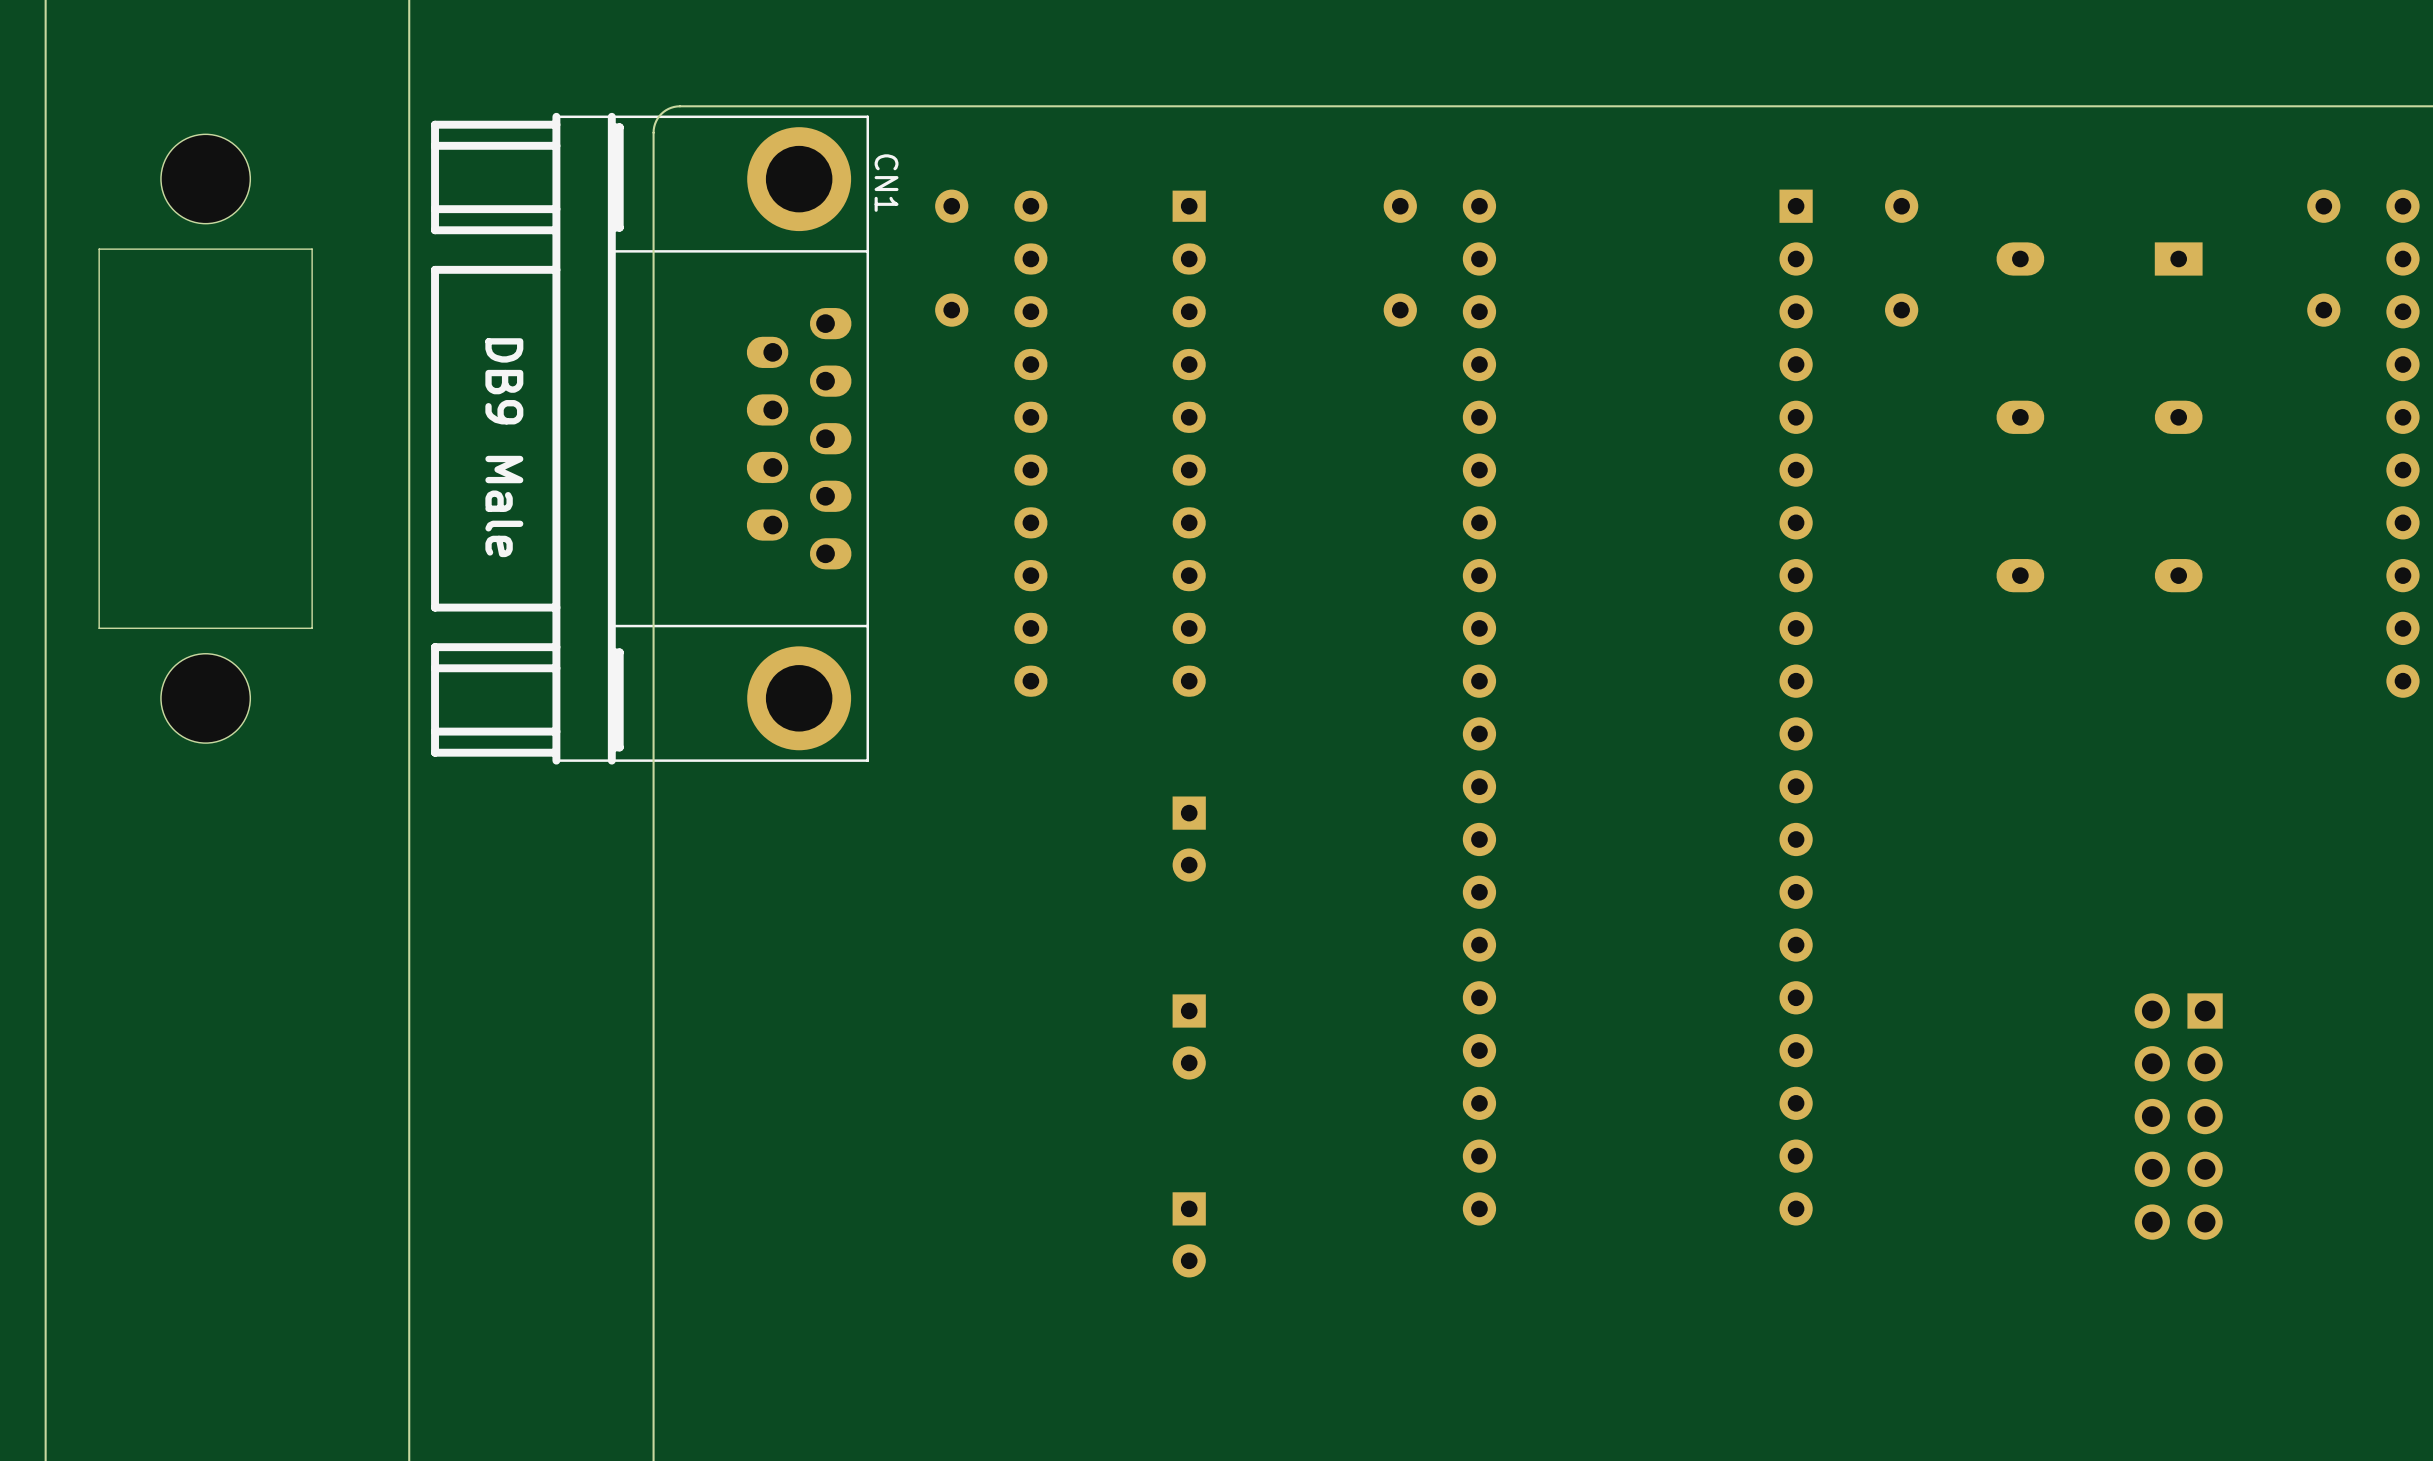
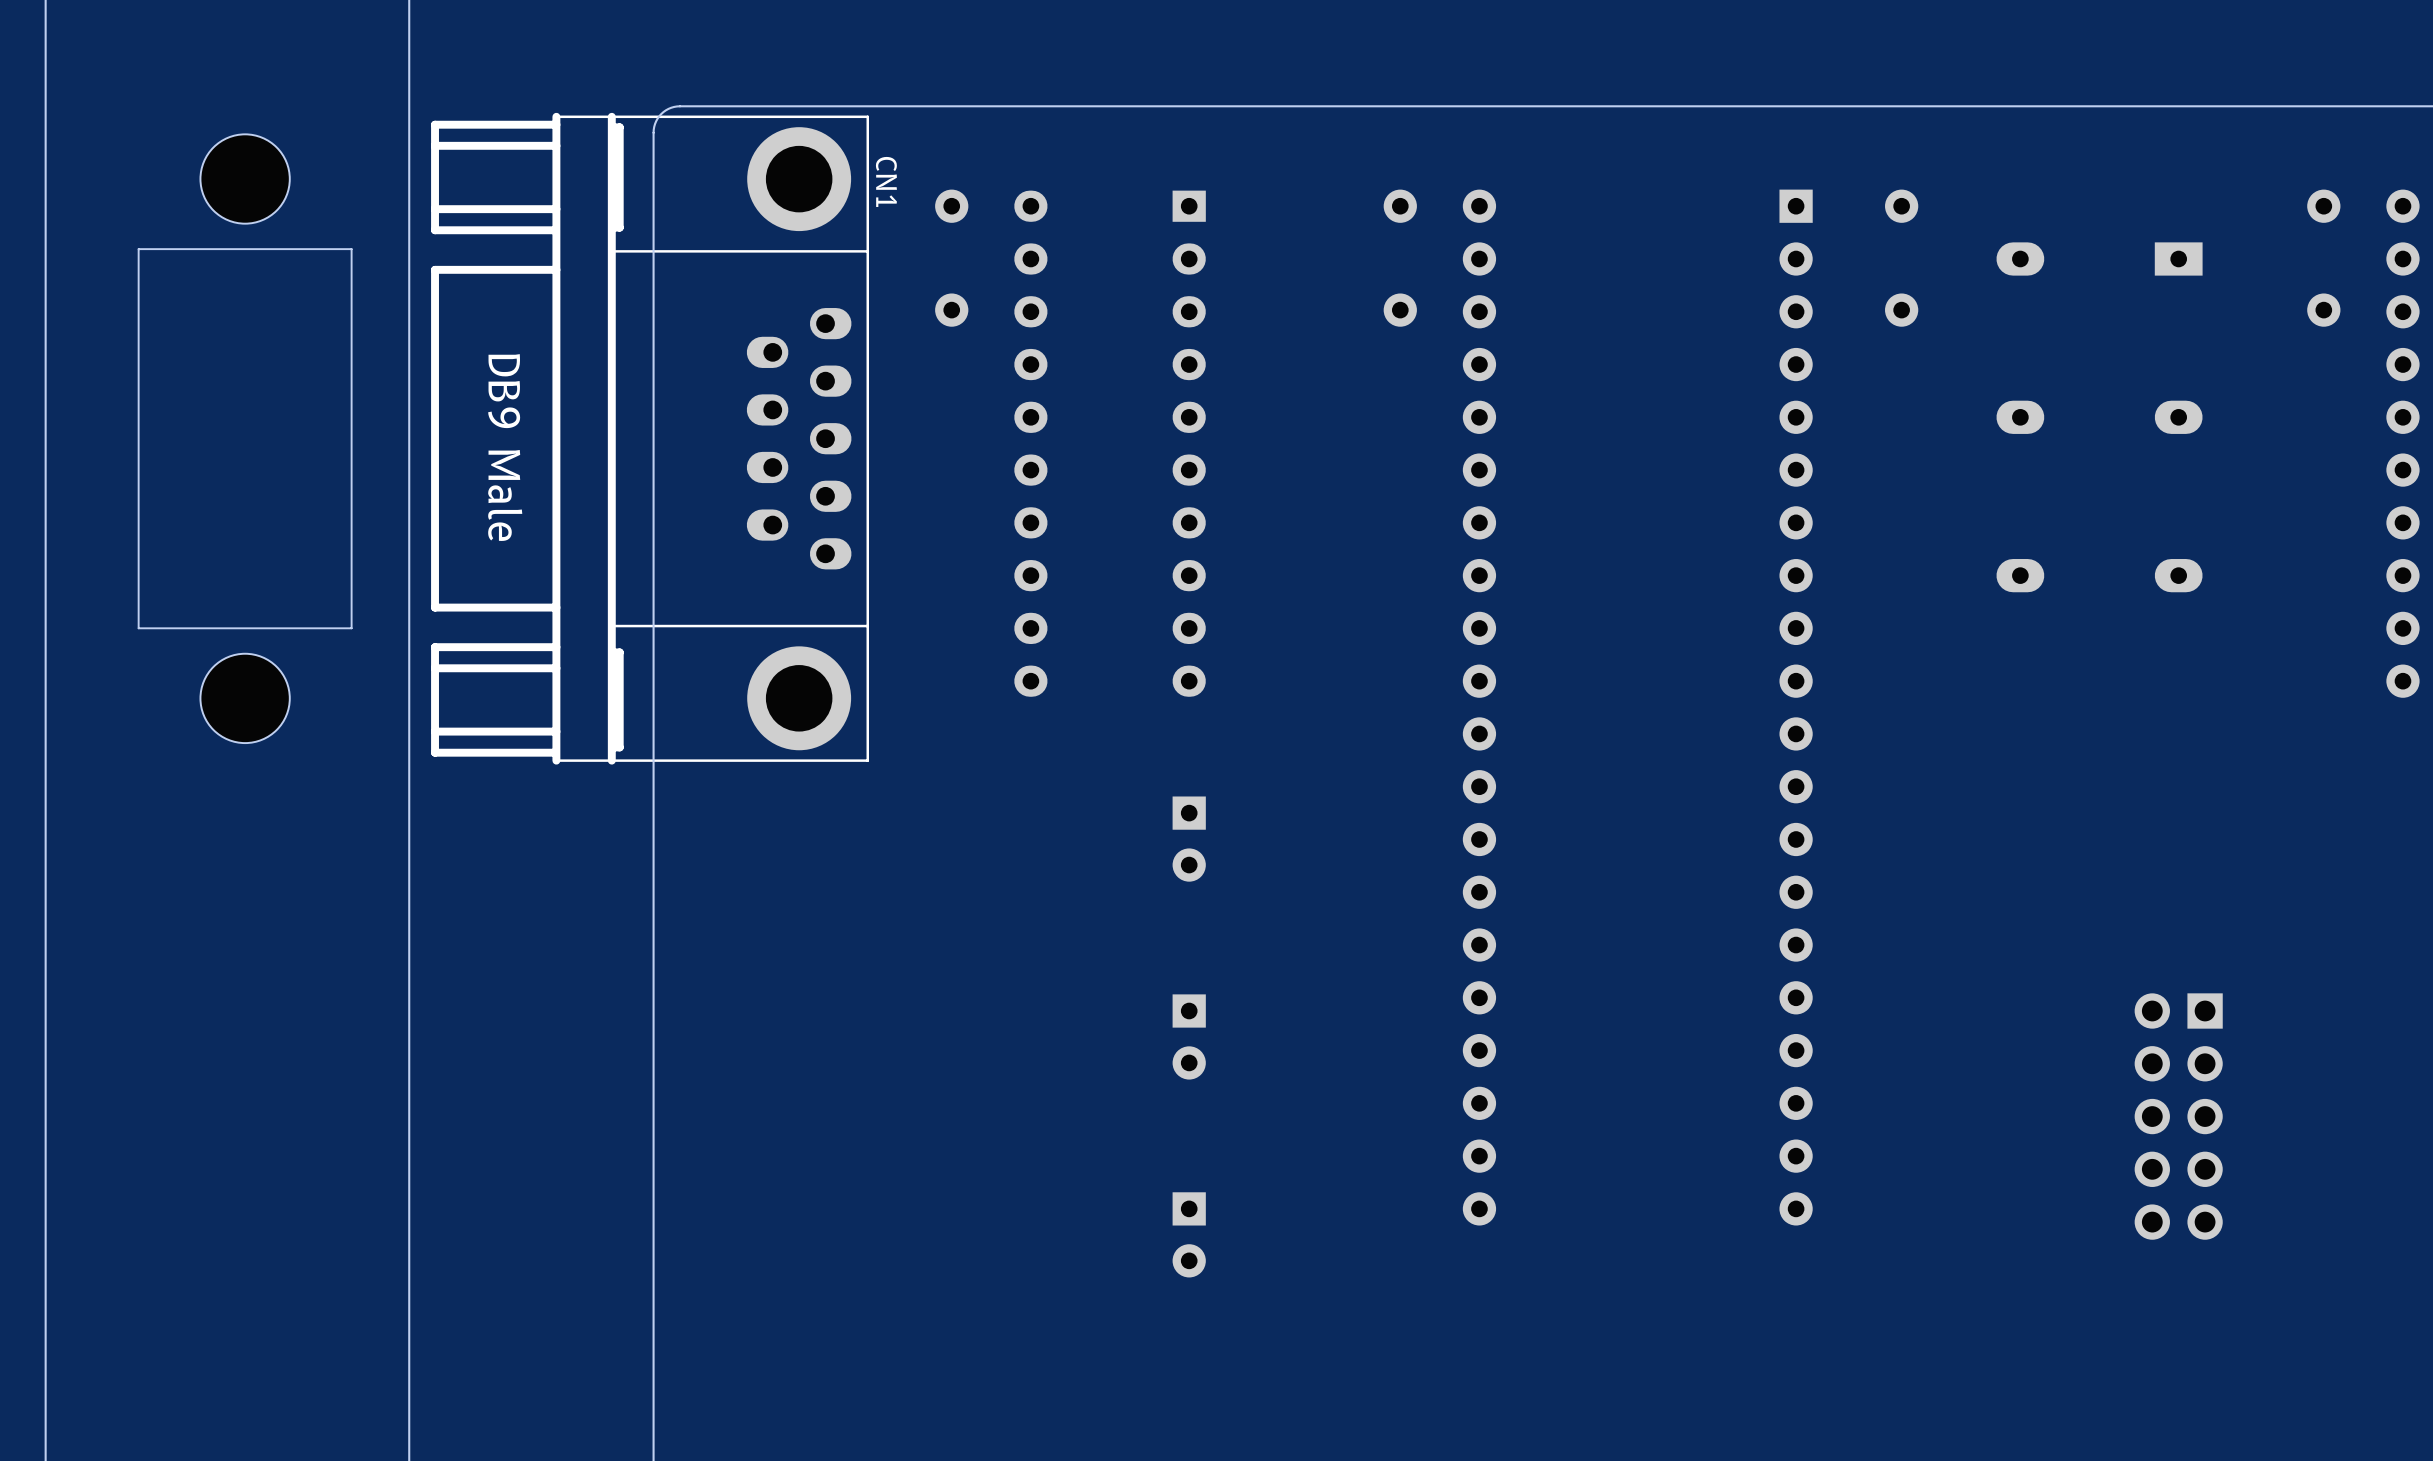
part position: (205, 179) -> (245, 179)
board edge: (138, 249) (99, 249) (99, 628) (138, 628) -> (138, 249) (138, 628)
board edge: (312, 249) (312, 628) -> (312, 249) (351, 249) (351, 628) (312, 628)
part position: (205, 698) -> (245, 698)

